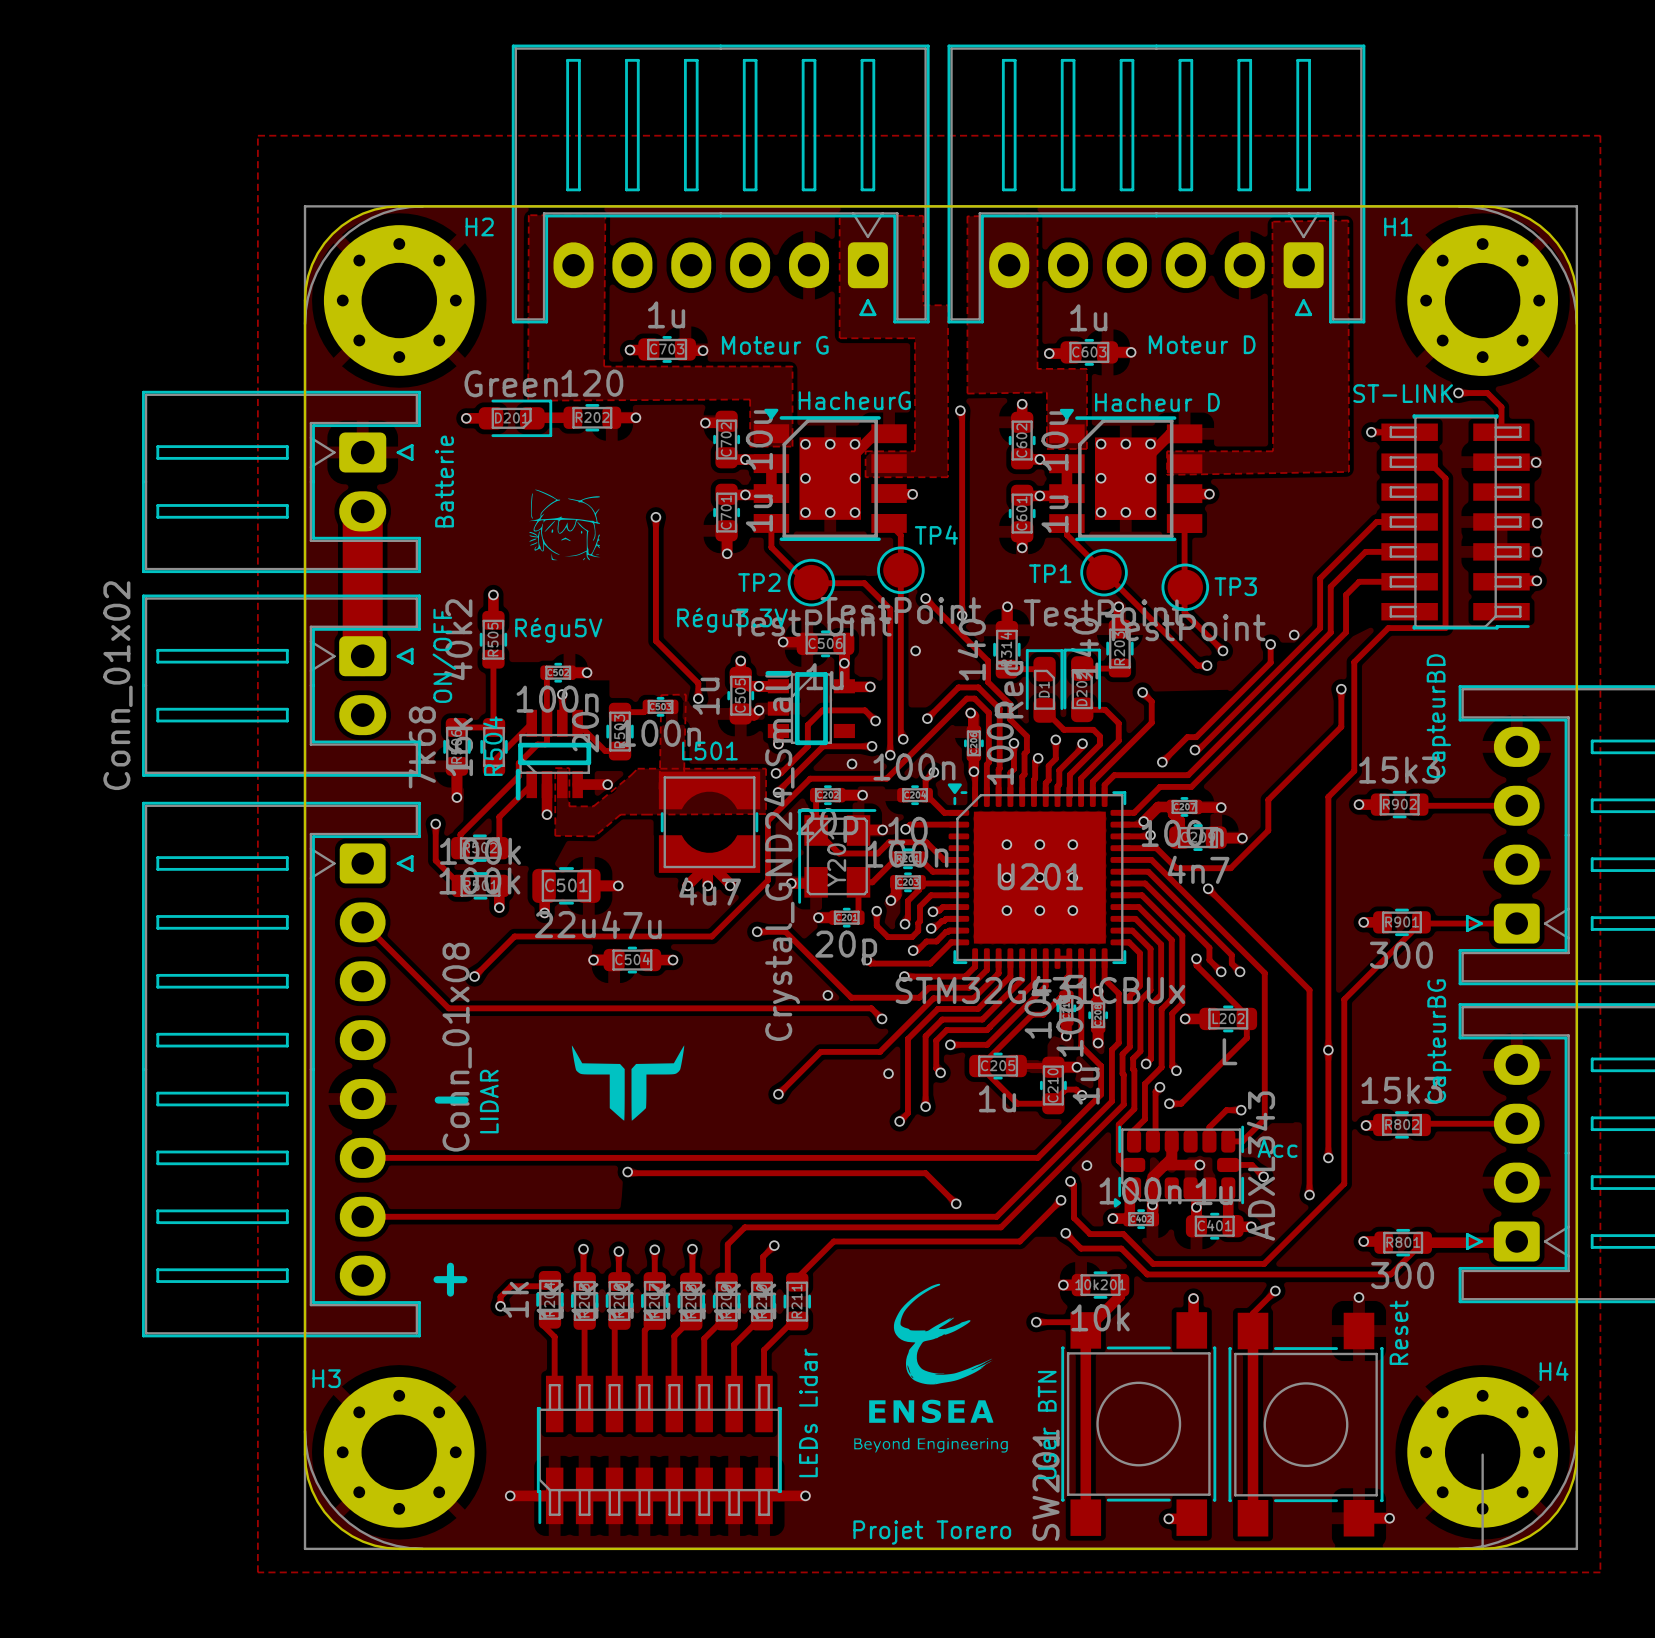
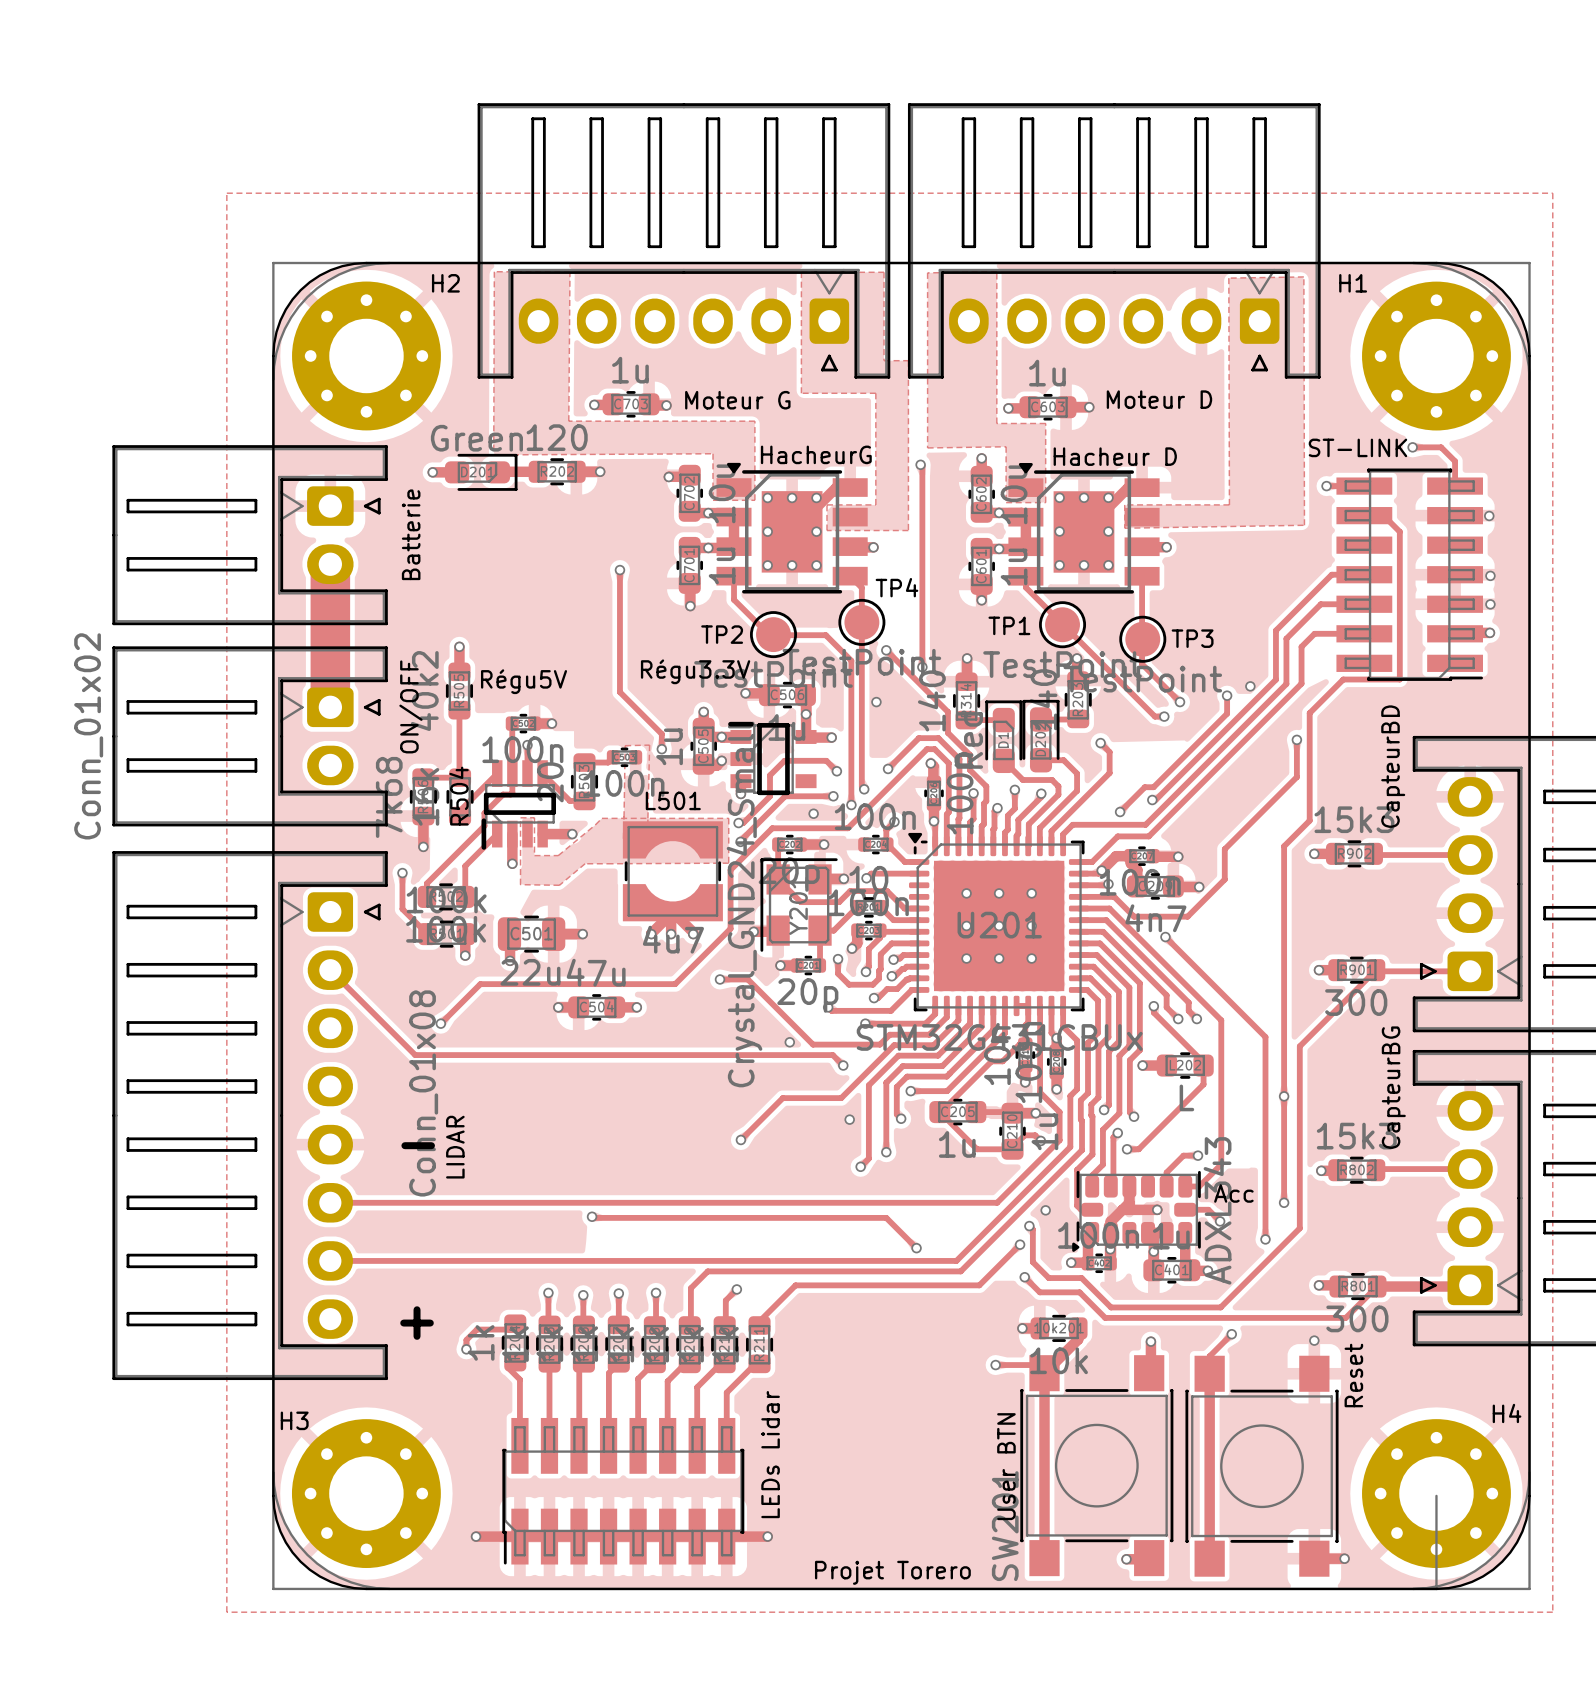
drawing: [528, 489, 601, 561] -> none
drawing: [571, 1045, 685, 1121] -> none
drawing: [854, 1283, 1008, 1453] -> none

